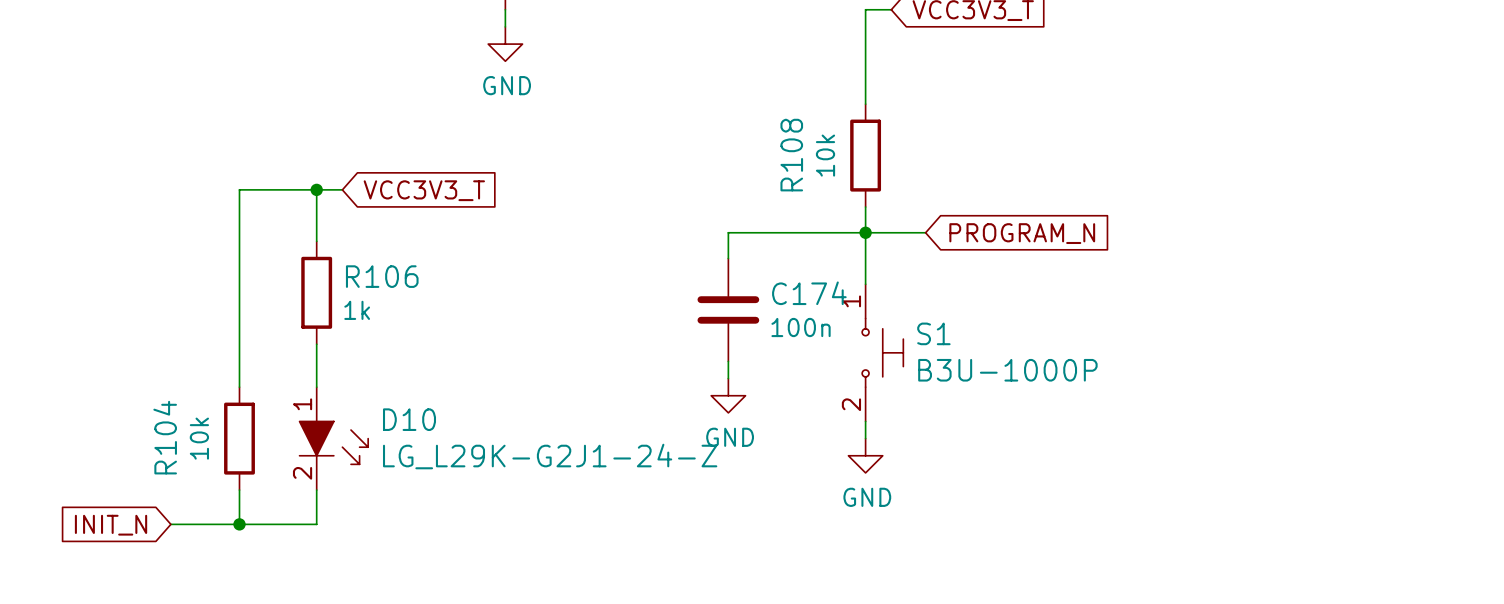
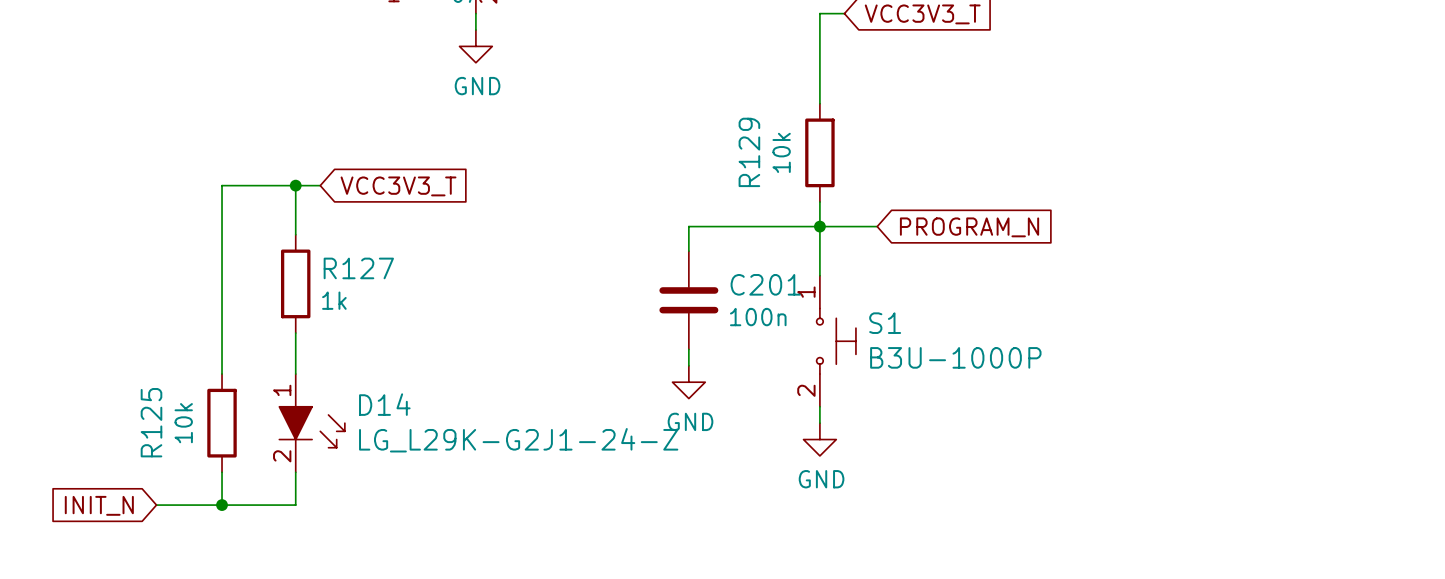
R108 name: R108 (791, 155) -> R129 (749, 152)
R106 name: R106 (382, 276) -> R127 (358, 268)
C174 name: C174 (809, 293) -> C201 (765, 284)
D10 name: D10 (409, 419) -> D14 (384, 404)
R104 name: R104 (165, 437) -> R125 (151, 422)

